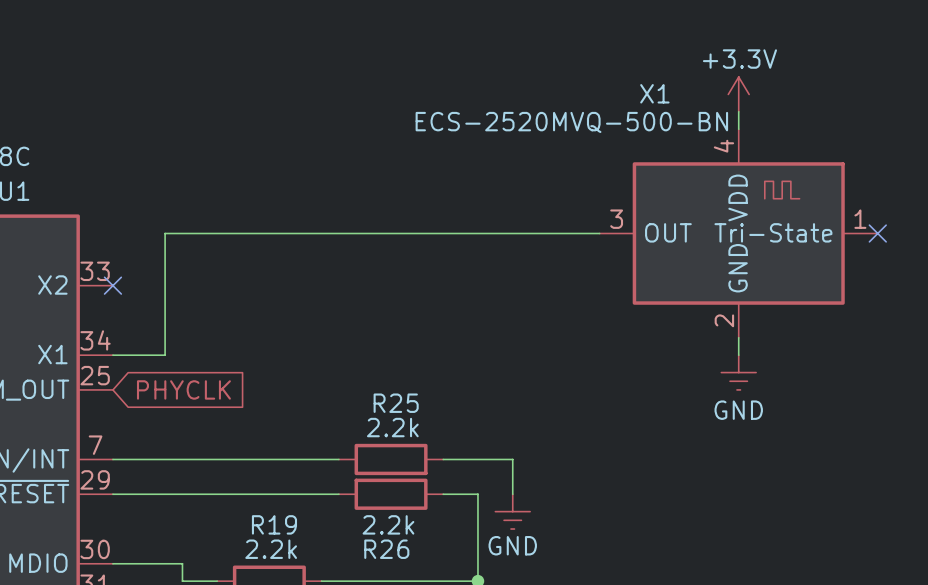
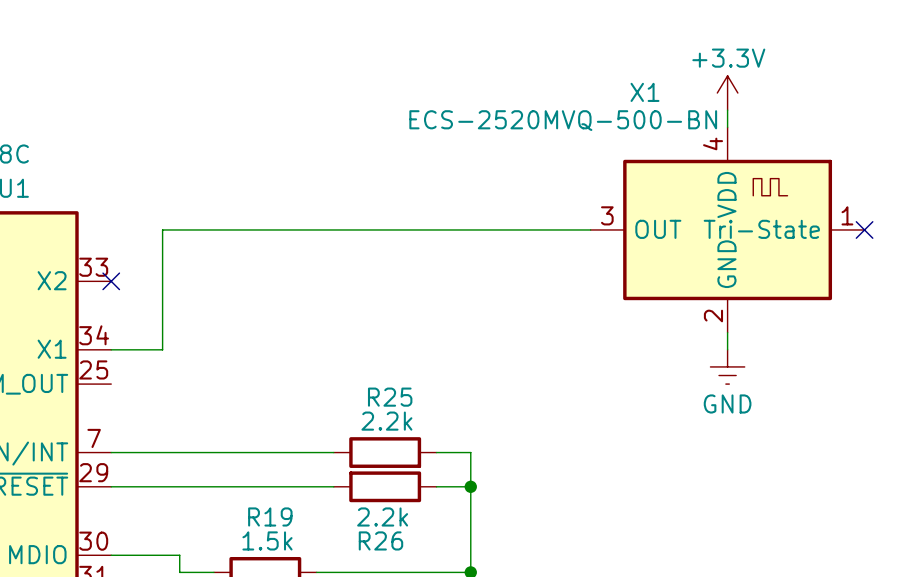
global label: PHYCLK (183, 389) -> none
wire: (477, 459) (512, 459) (512, 494) -> (470, 452) (470, 486)
junction: none -> (470, 486)
power symbol: GND (512, 511) -> none
R19 value: 2.2k (271, 549) -> 1.5k (267, 540)

